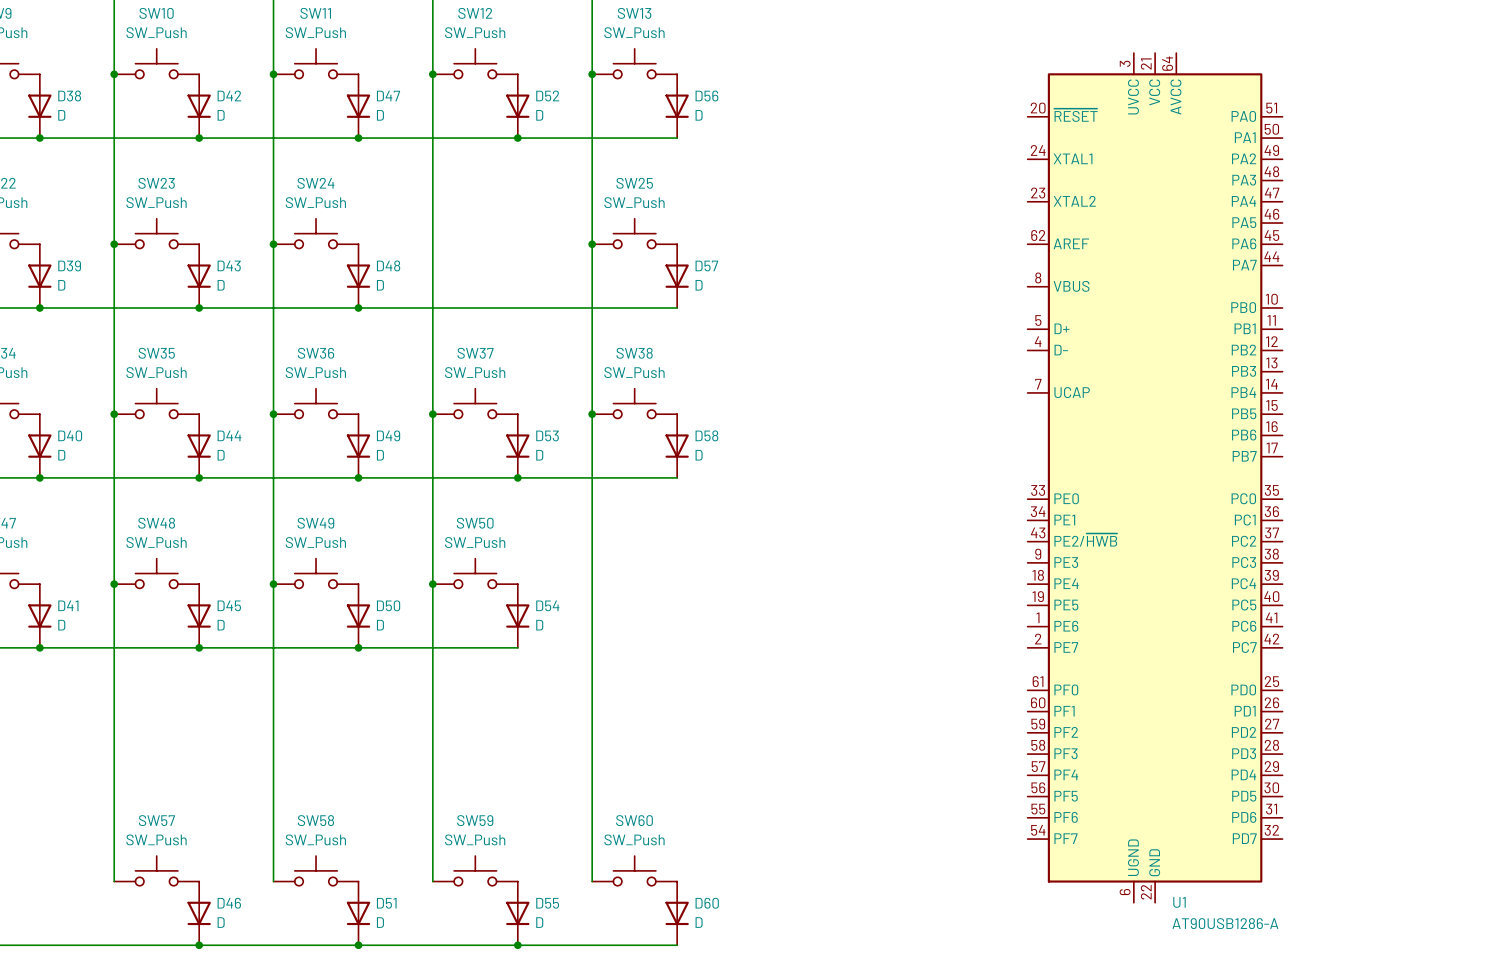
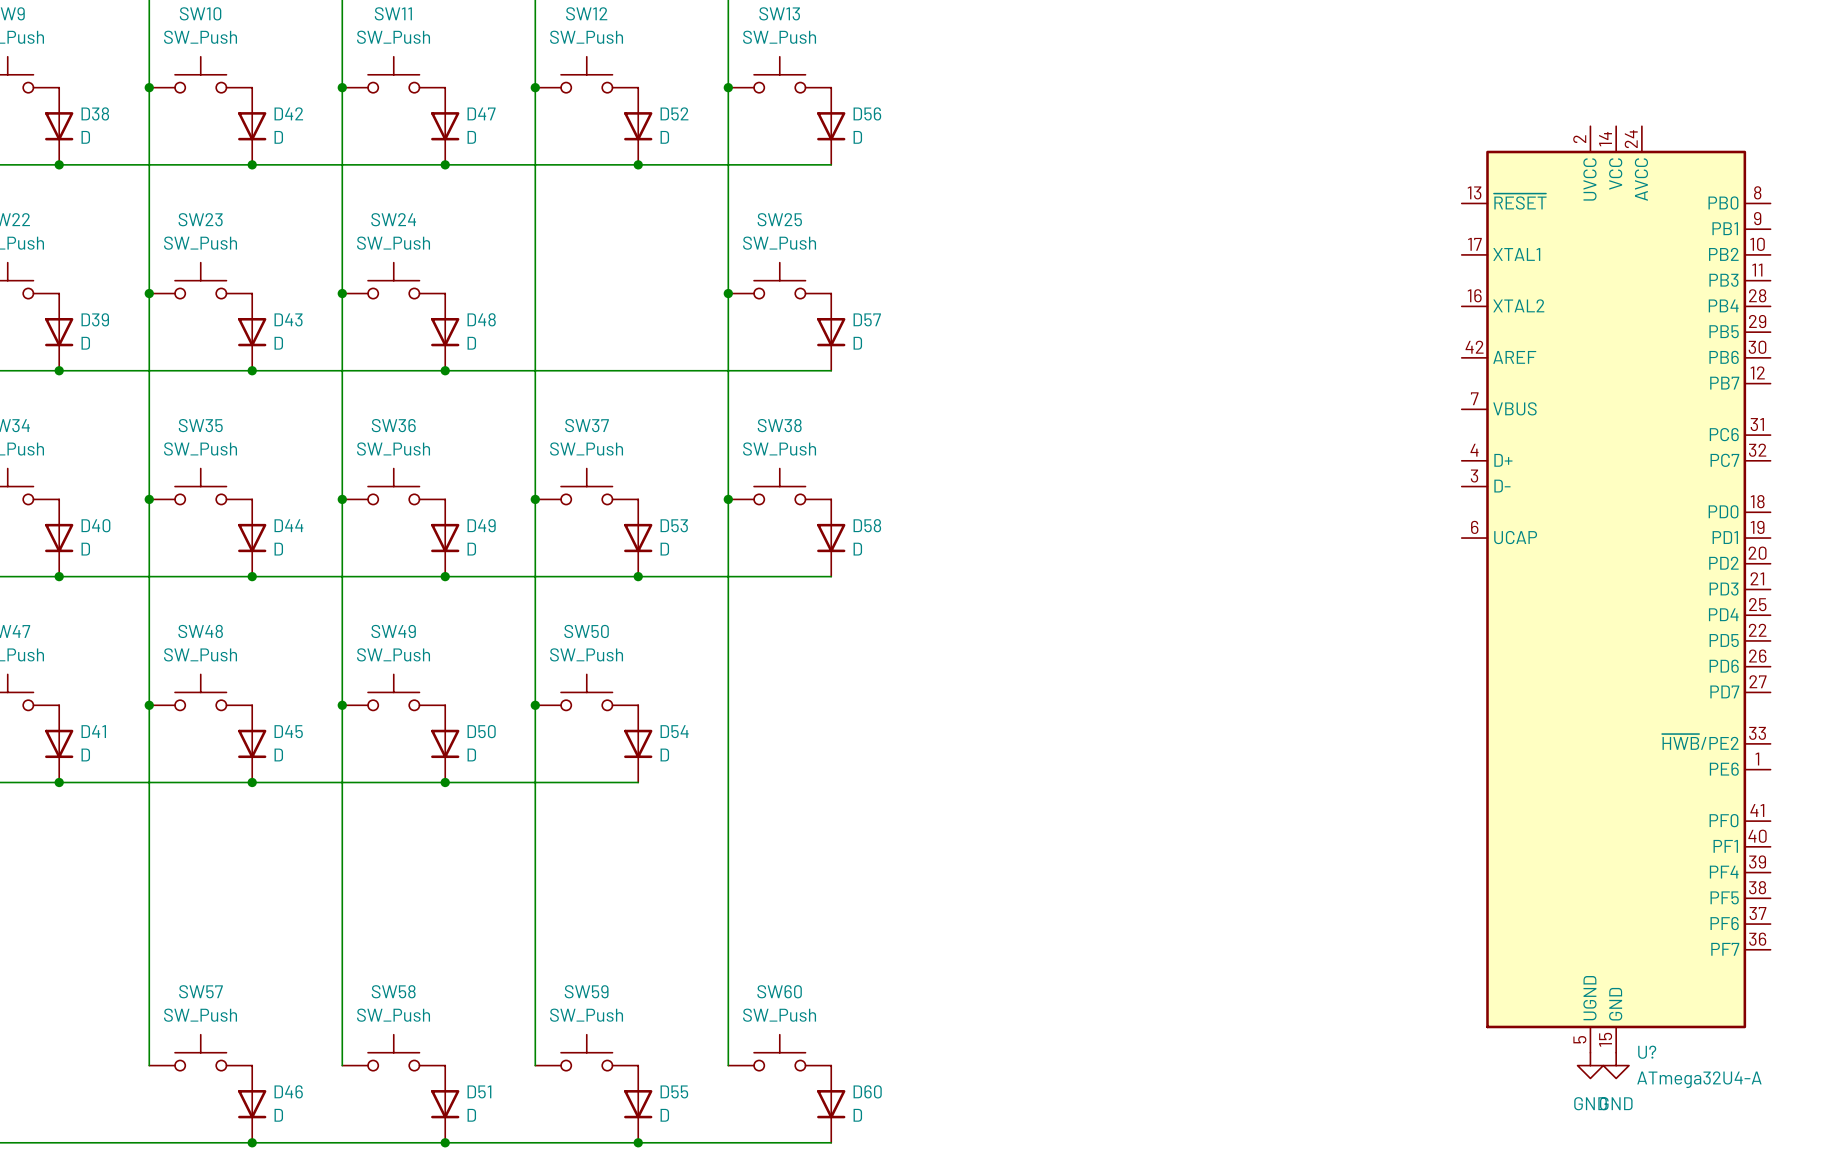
U1: AT90USB1286-A (1155, 477) -> none
U?: none -> ATmega32U4-A (1616, 589)
power symbol: none -> GND (1590, 1065)
power symbol: none -> GND (1616, 1065)

